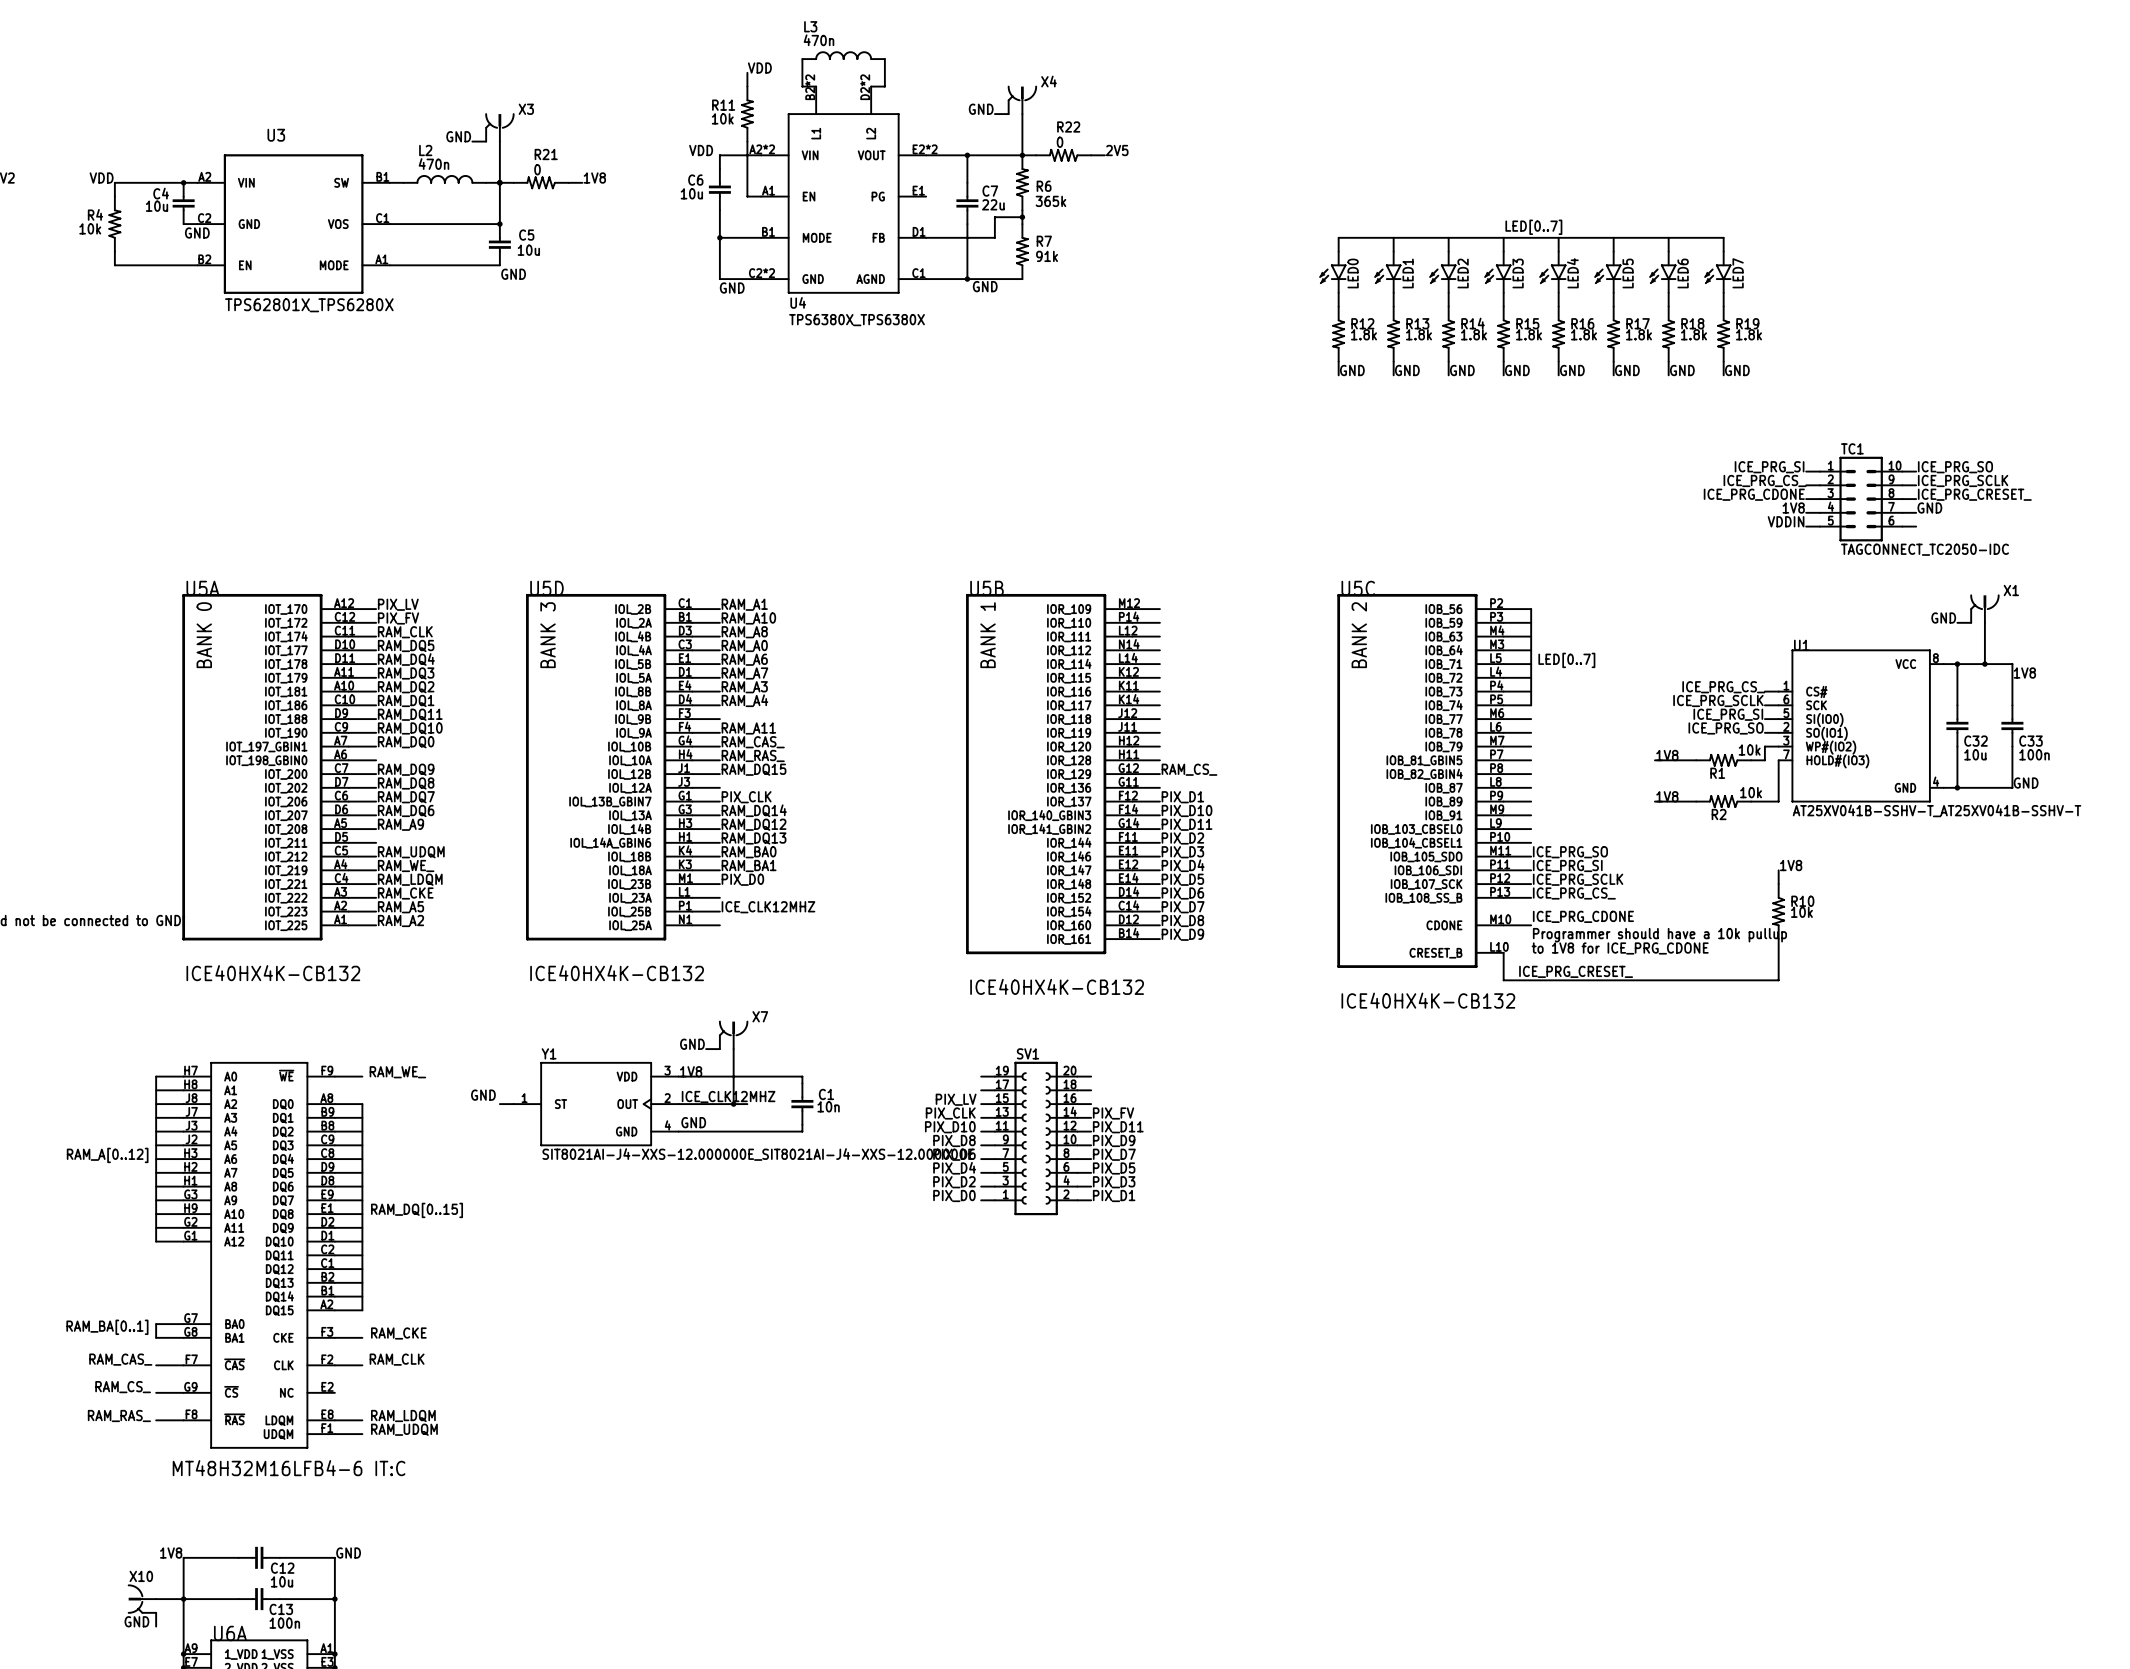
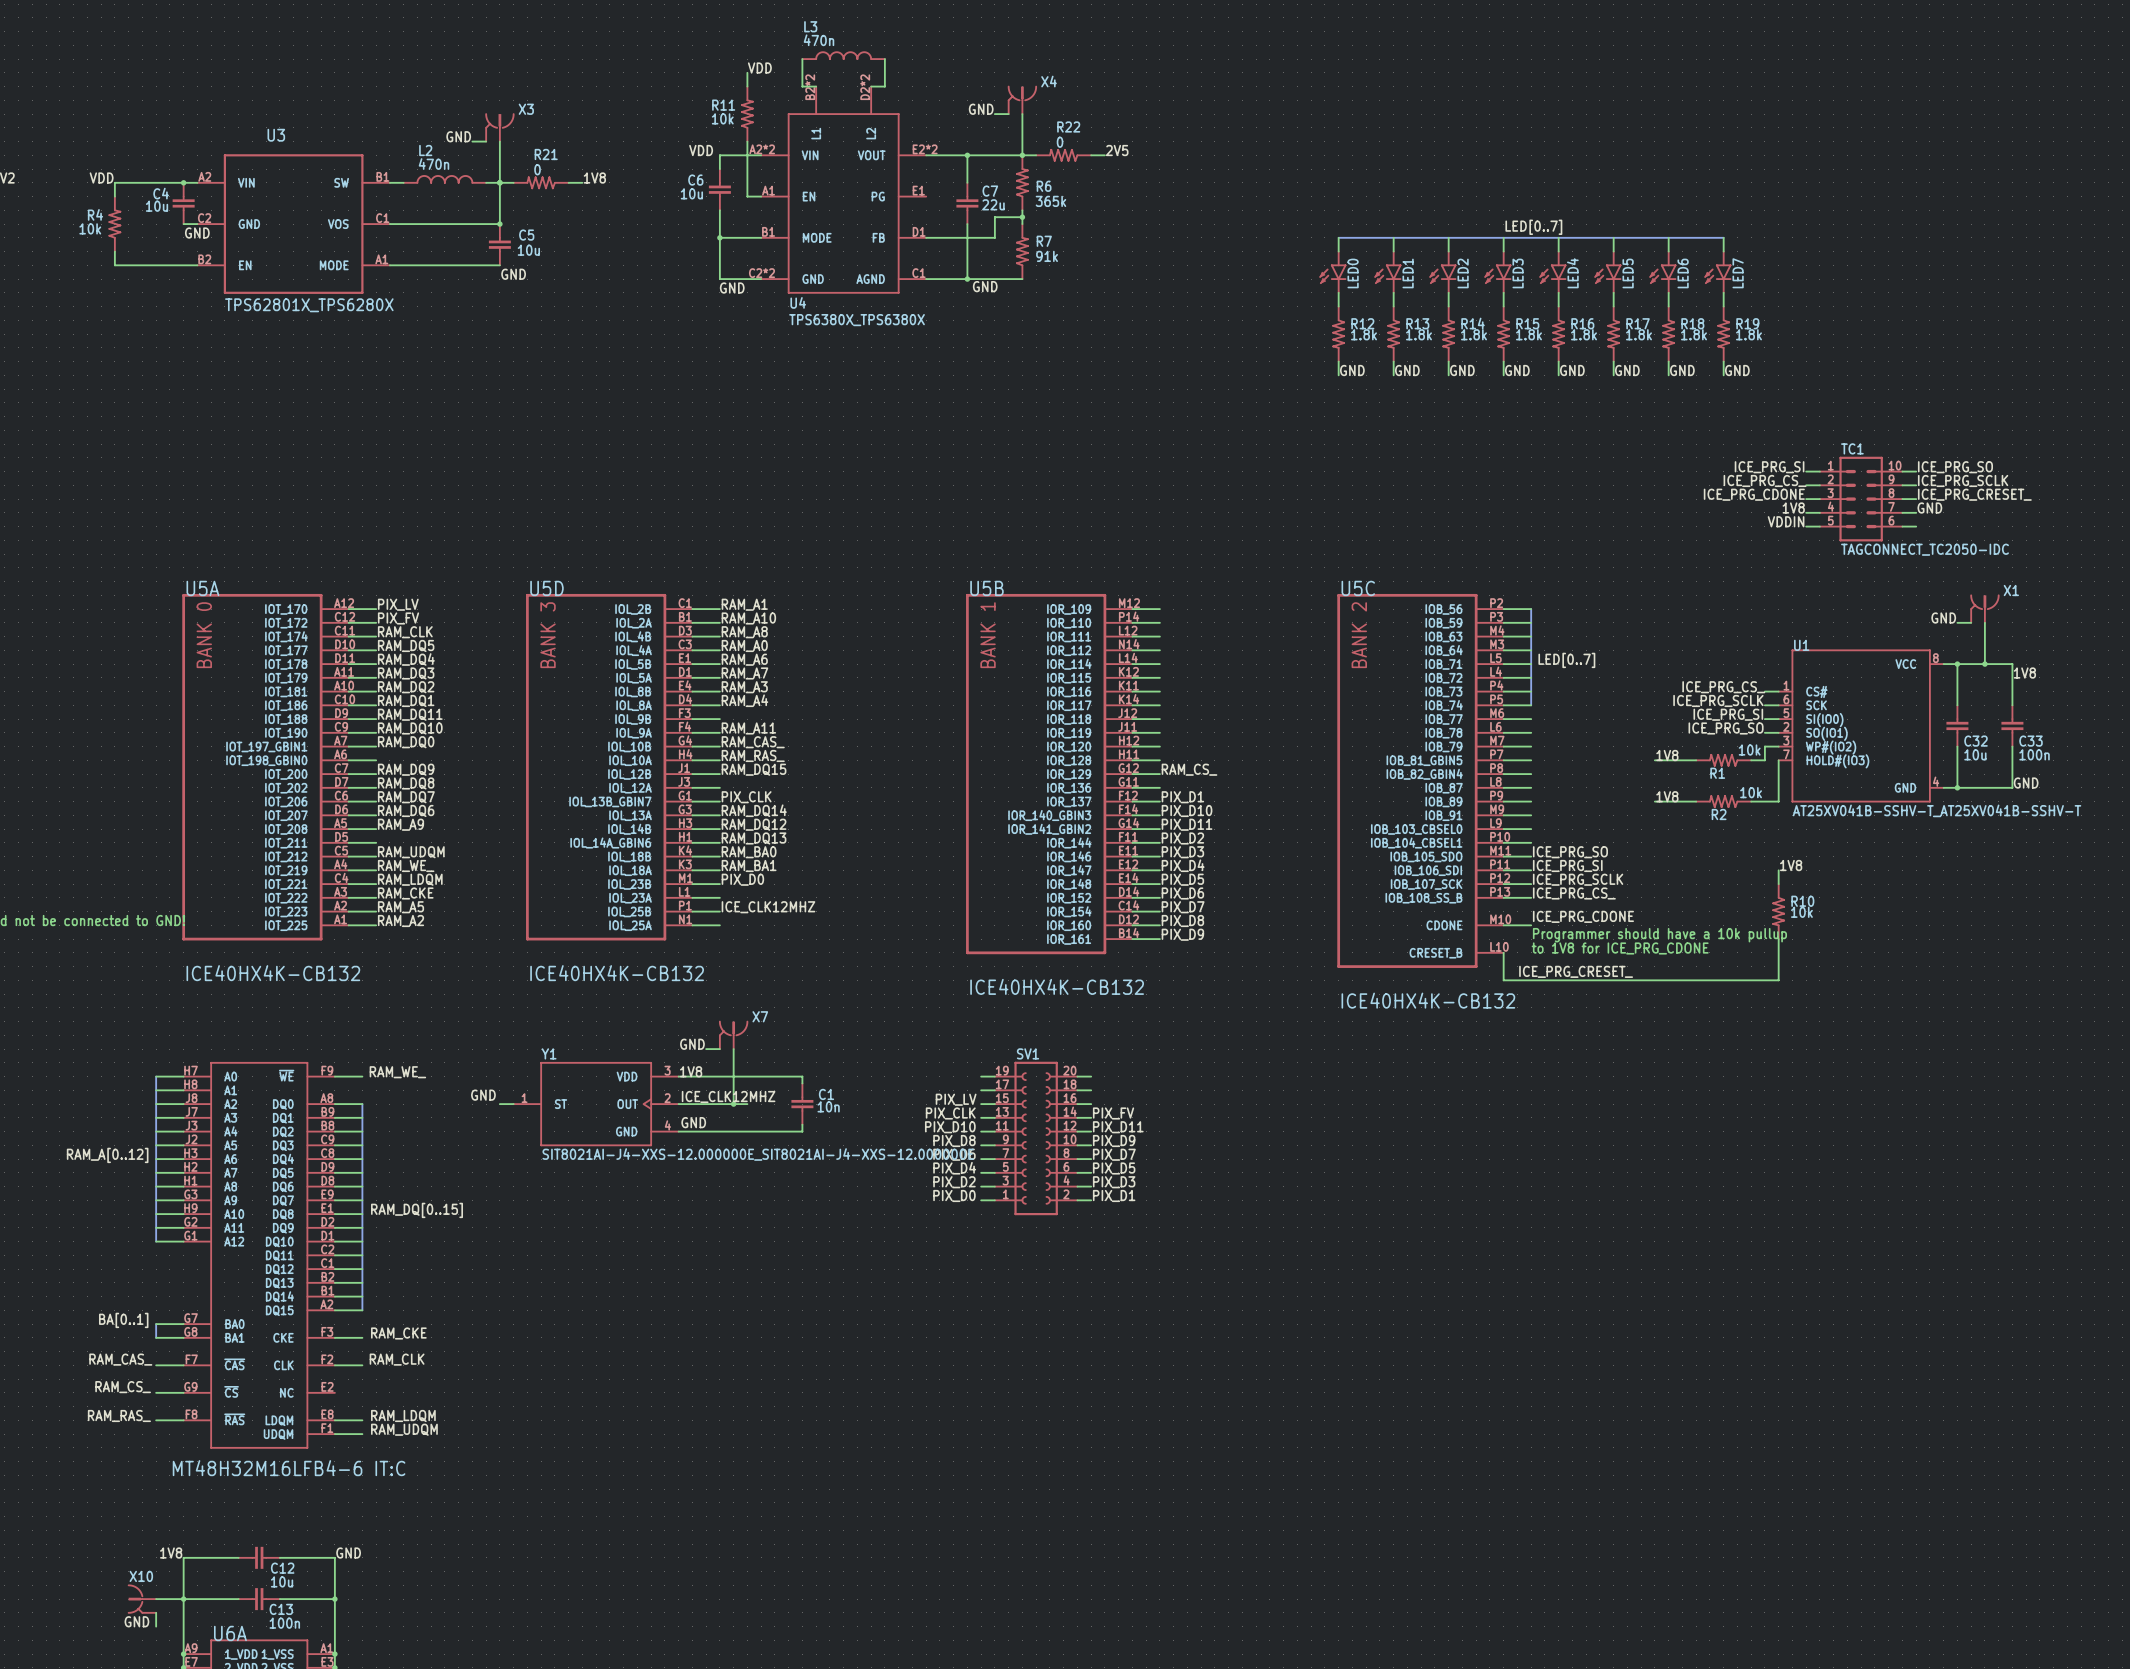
label: RAM_BA[0..1] (107, 1327) -> BA[0..1] (123, 1320)

